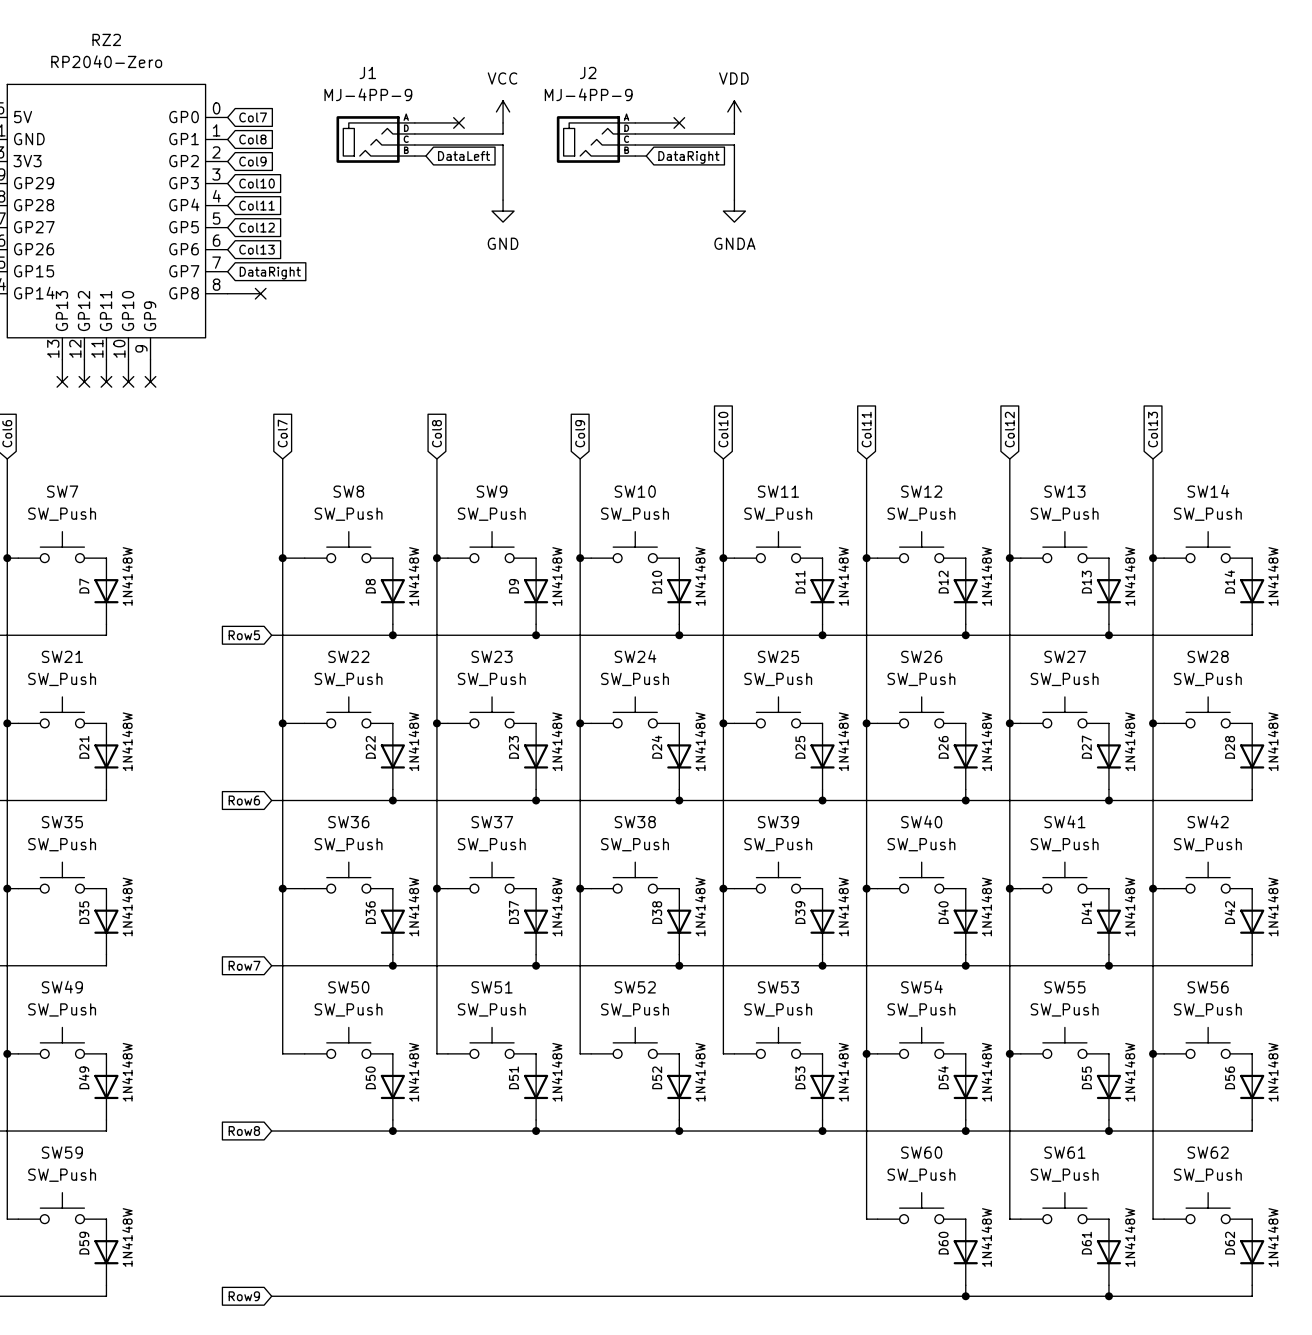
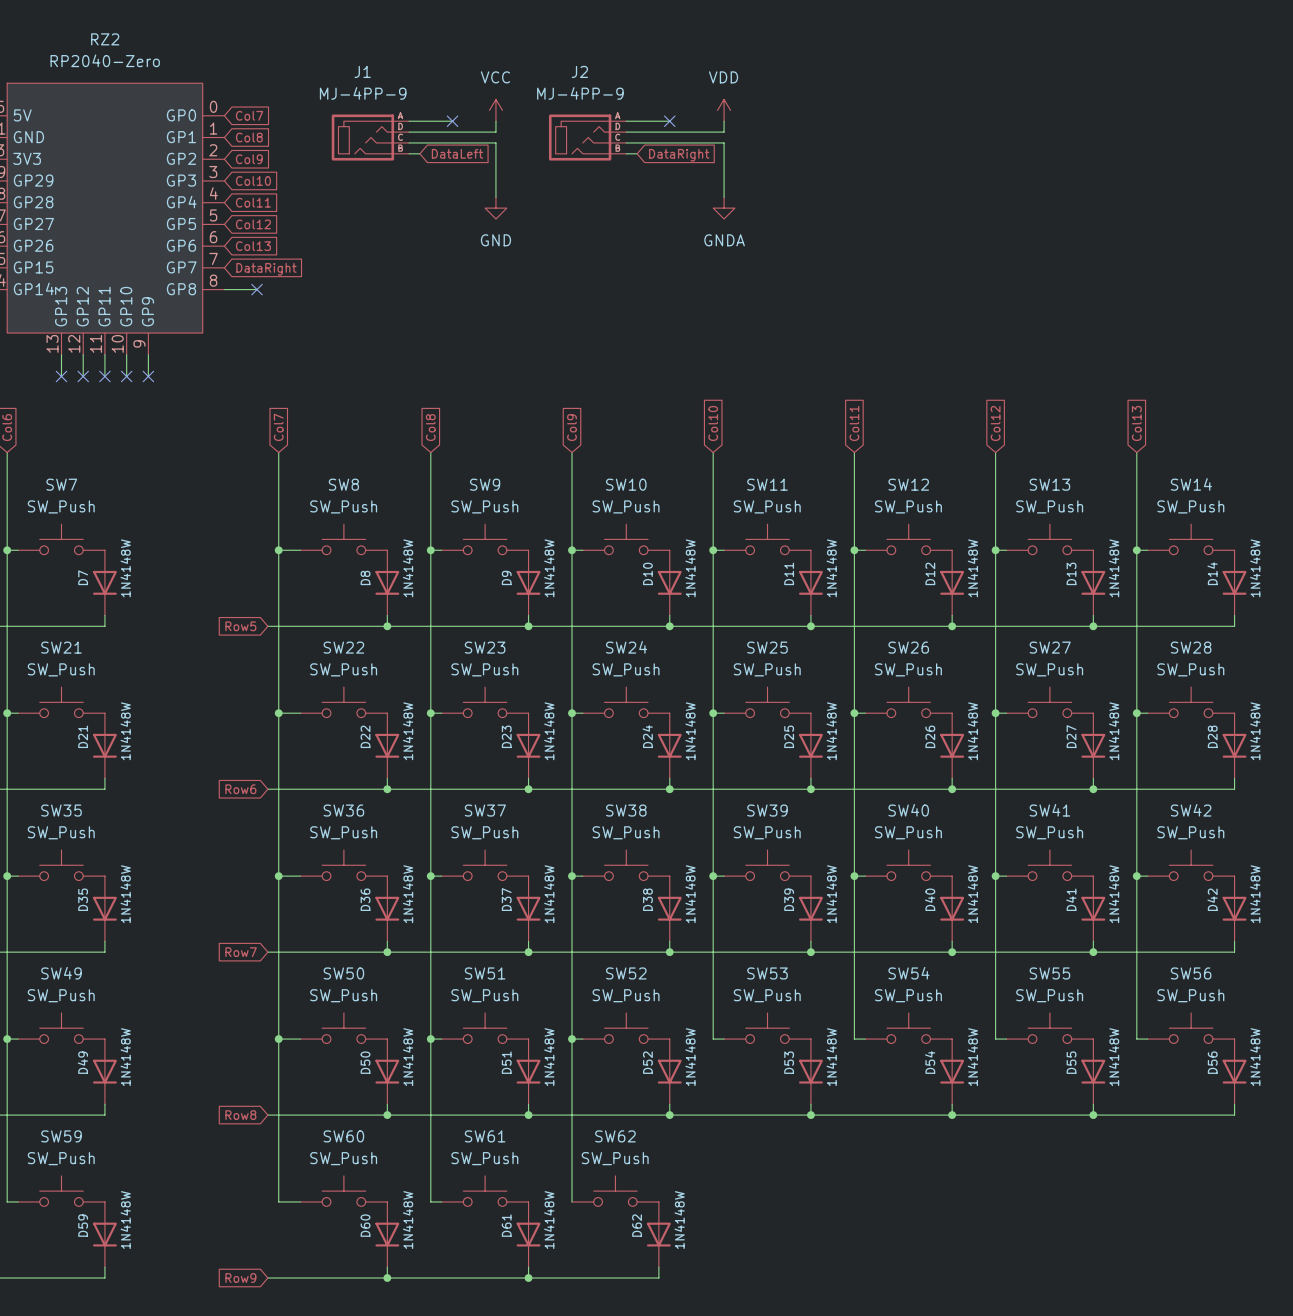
wire: none -> (278, 1039) (278, 1201) (300, 1201)
junction: none -> (278, 1039)
wire: none -> (430, 1039) (430, 1201) (441, 1201)
junction: none -> (430, 1039)
wire: none -> (571, 1039) (571, 1201)
junction: none -> (571, 1039)
wire: (866, 1053) (866, 1219) (877, 1219) -> none
junction: (866, 1053) -> none
wire: (1009, 1053) (1009, 1219) (1020, 1219) -> none
junction: (1009, 1053) -> none
wire: (1153, 1053) (1153, 1219) (1164, 1219) -> none
junction: (1153, 1053) -> none
SW60 position: (921, 1208) -> (343, 1191)
SW61 position: (1064, 1208) -> (485, 1191)
SW62 position: (1208, 1208) -> (615, 1191)
D60 position: (965, 1252) -> (387, 1234)
D61 position: (1108, 1252) -> (528, 1234)
D62 position: (1252, 1252) -> (658, 1234)
wire: none -> (387, 1267) (387, 1278)
wire: none -> (528, 1267) (528, 1278)
wire: (965, 1285) (965, 1296) -> none
wire: (1108, 1285) (1108, 1296) -> none
wire: (1252, 1285) (1252, 1296) (668, 1296) -> (658, 1267) (658, 1278)
junction: none -> (387, 1278)
junction: none -> (528, 1278)
junction: (965, 1296) -> none
junction: (1108, 1296) -> none

